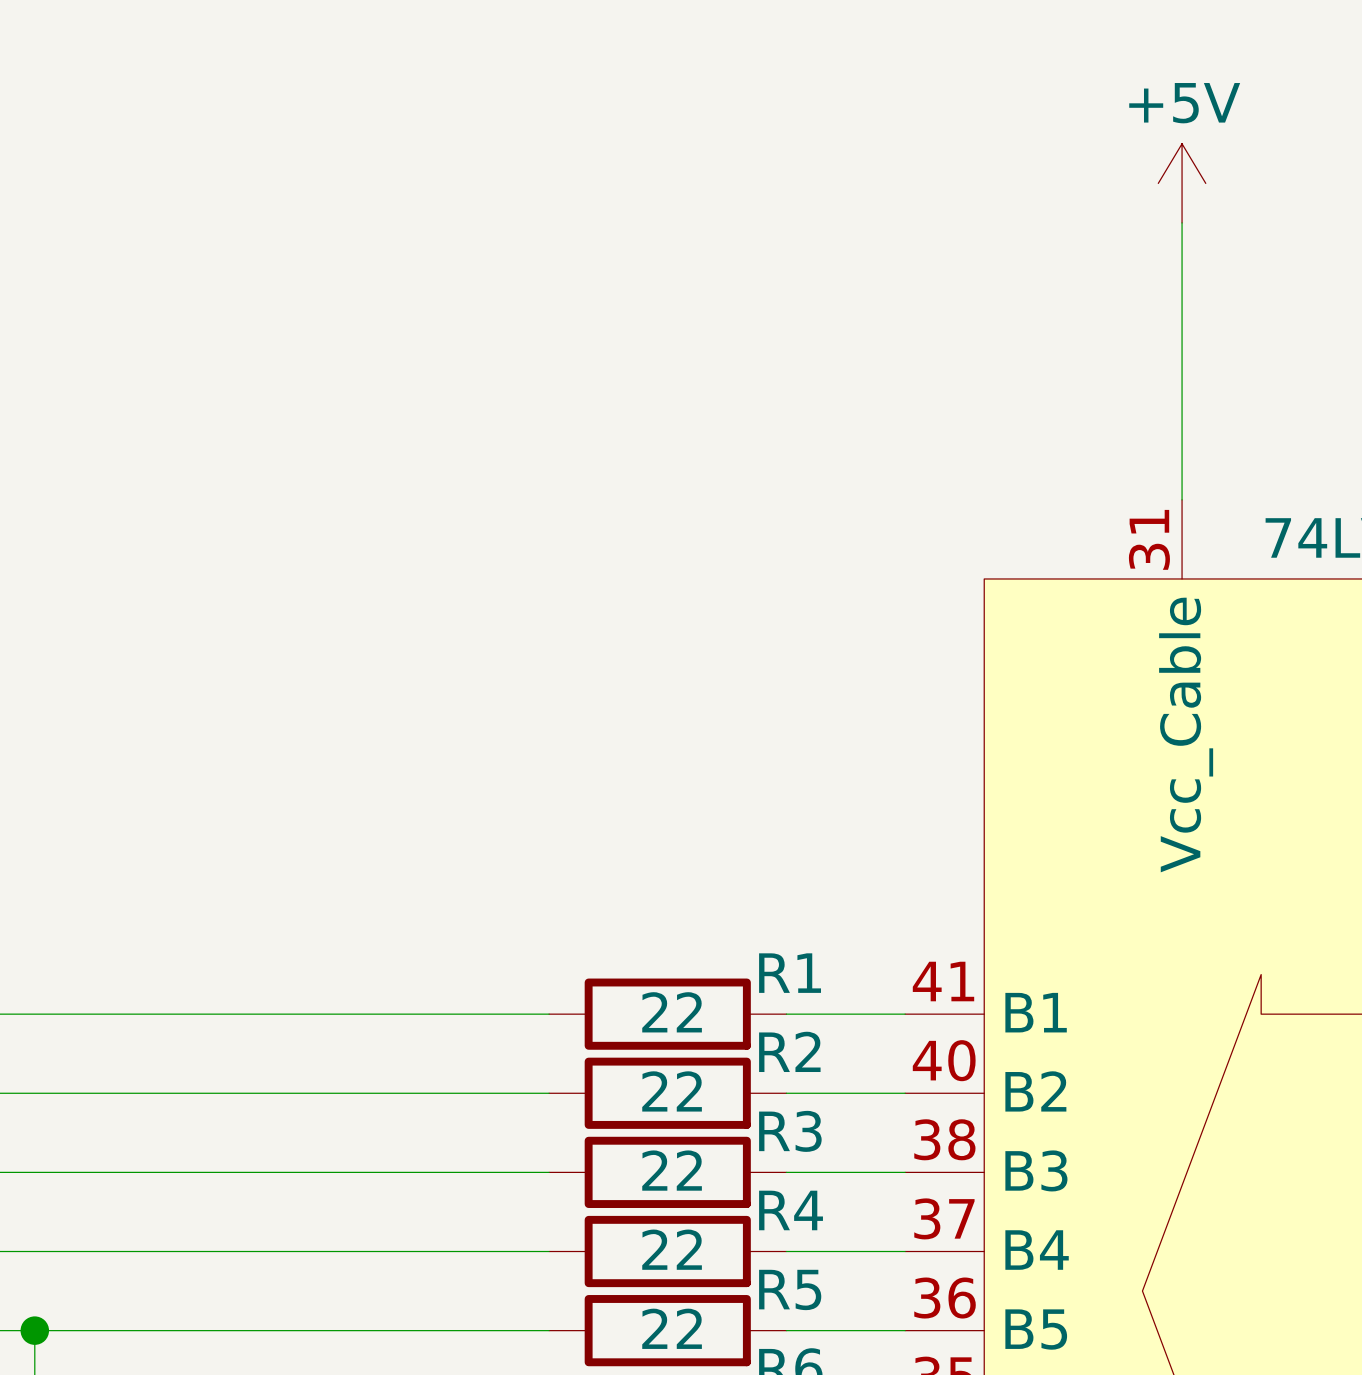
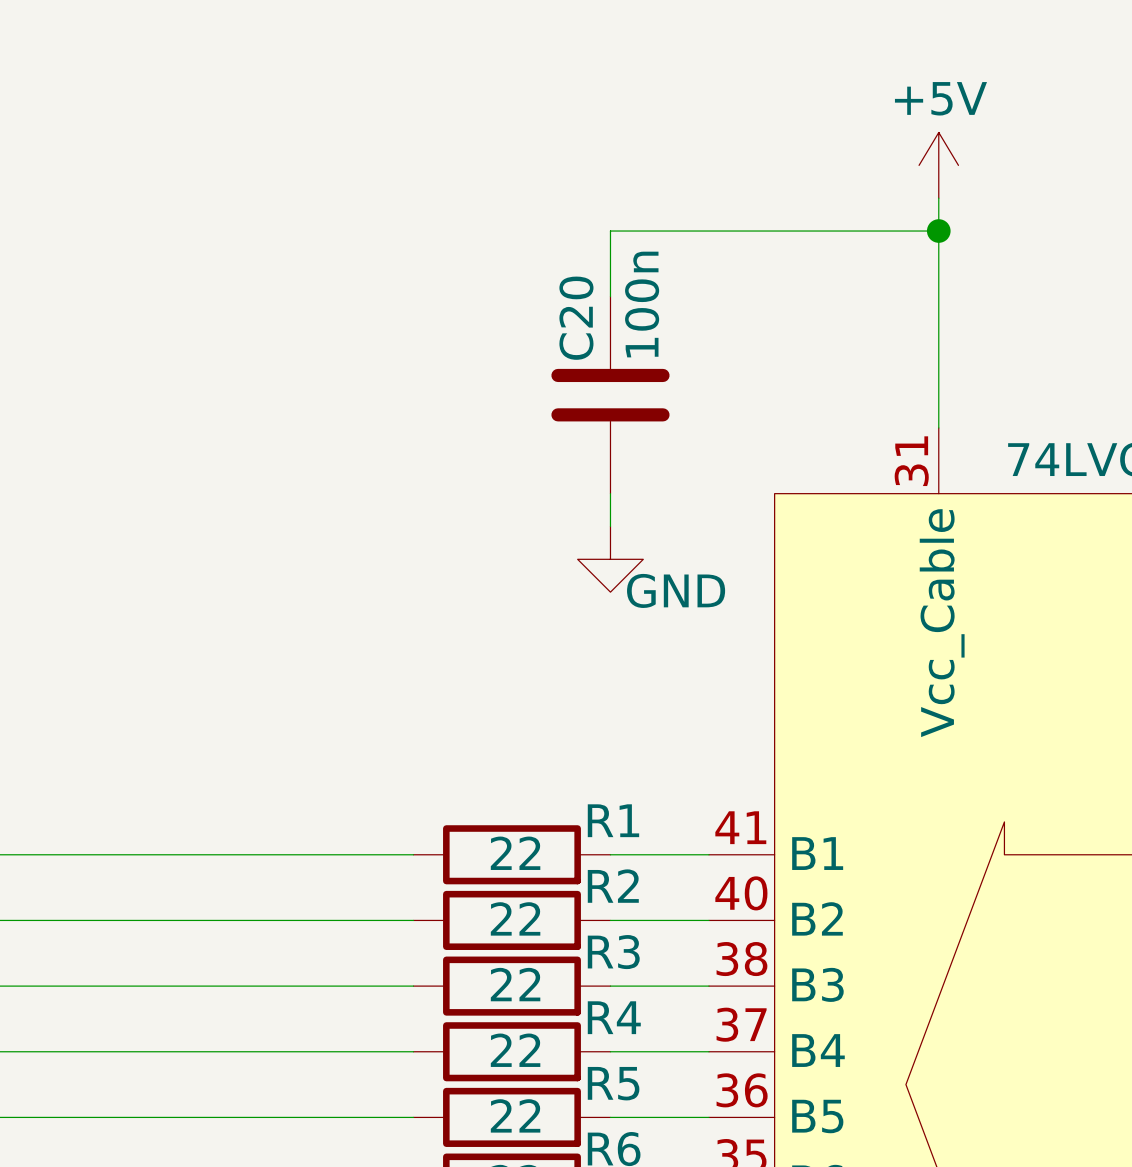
wire: none -> (938, 231) (610, 231) (610, 296)
junction: none -> (938, 231)
C20: none -> 100n (610, 395)
wire: none -> (610, 493) (610, 526)
power symbol: none -> GND (610, 559)

